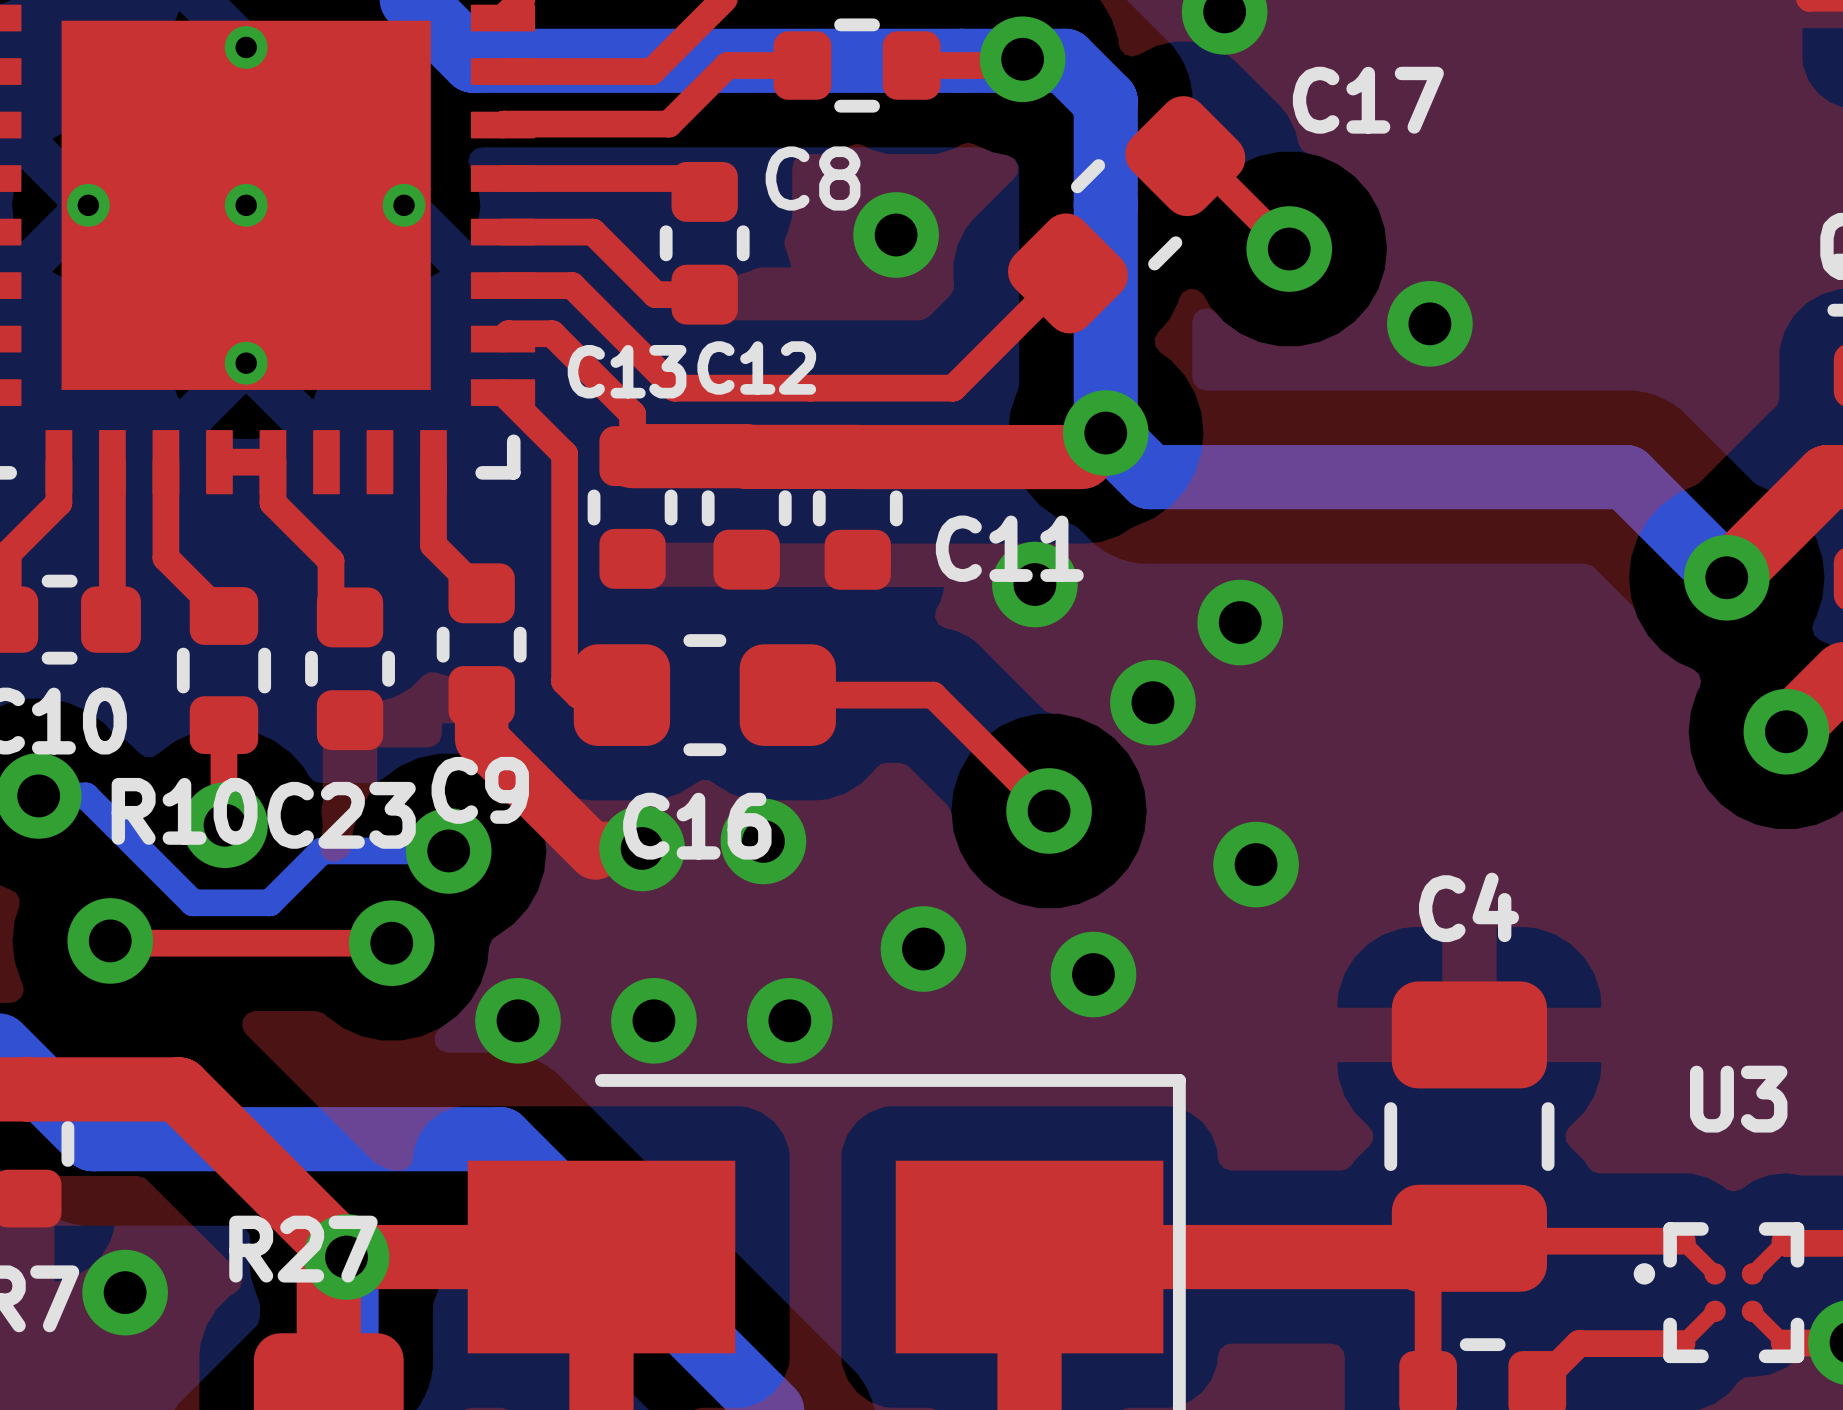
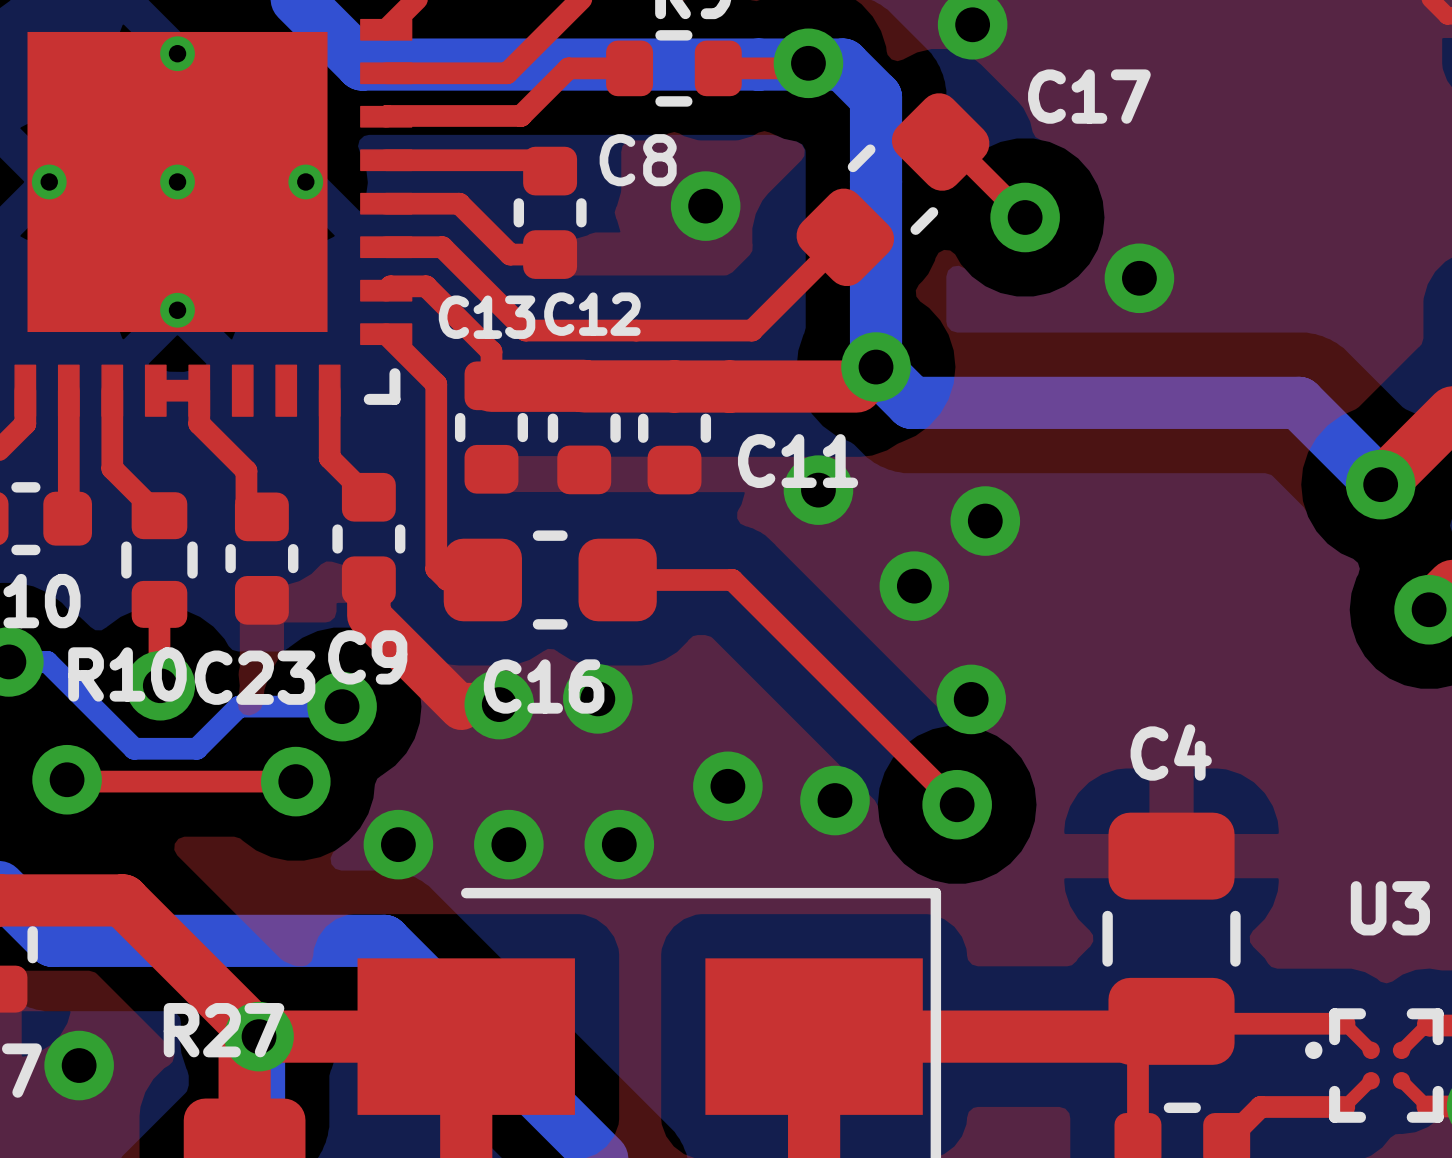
top track: (929, 695) (933, 695) (1049, 810) -> (732, 580) (957, 804)
via: (1049, 810) -> none
via position: (1256, 864) -> (971, 699)
via: none -> (957, 804)
via position: (1093, 974) -> (834, 800)

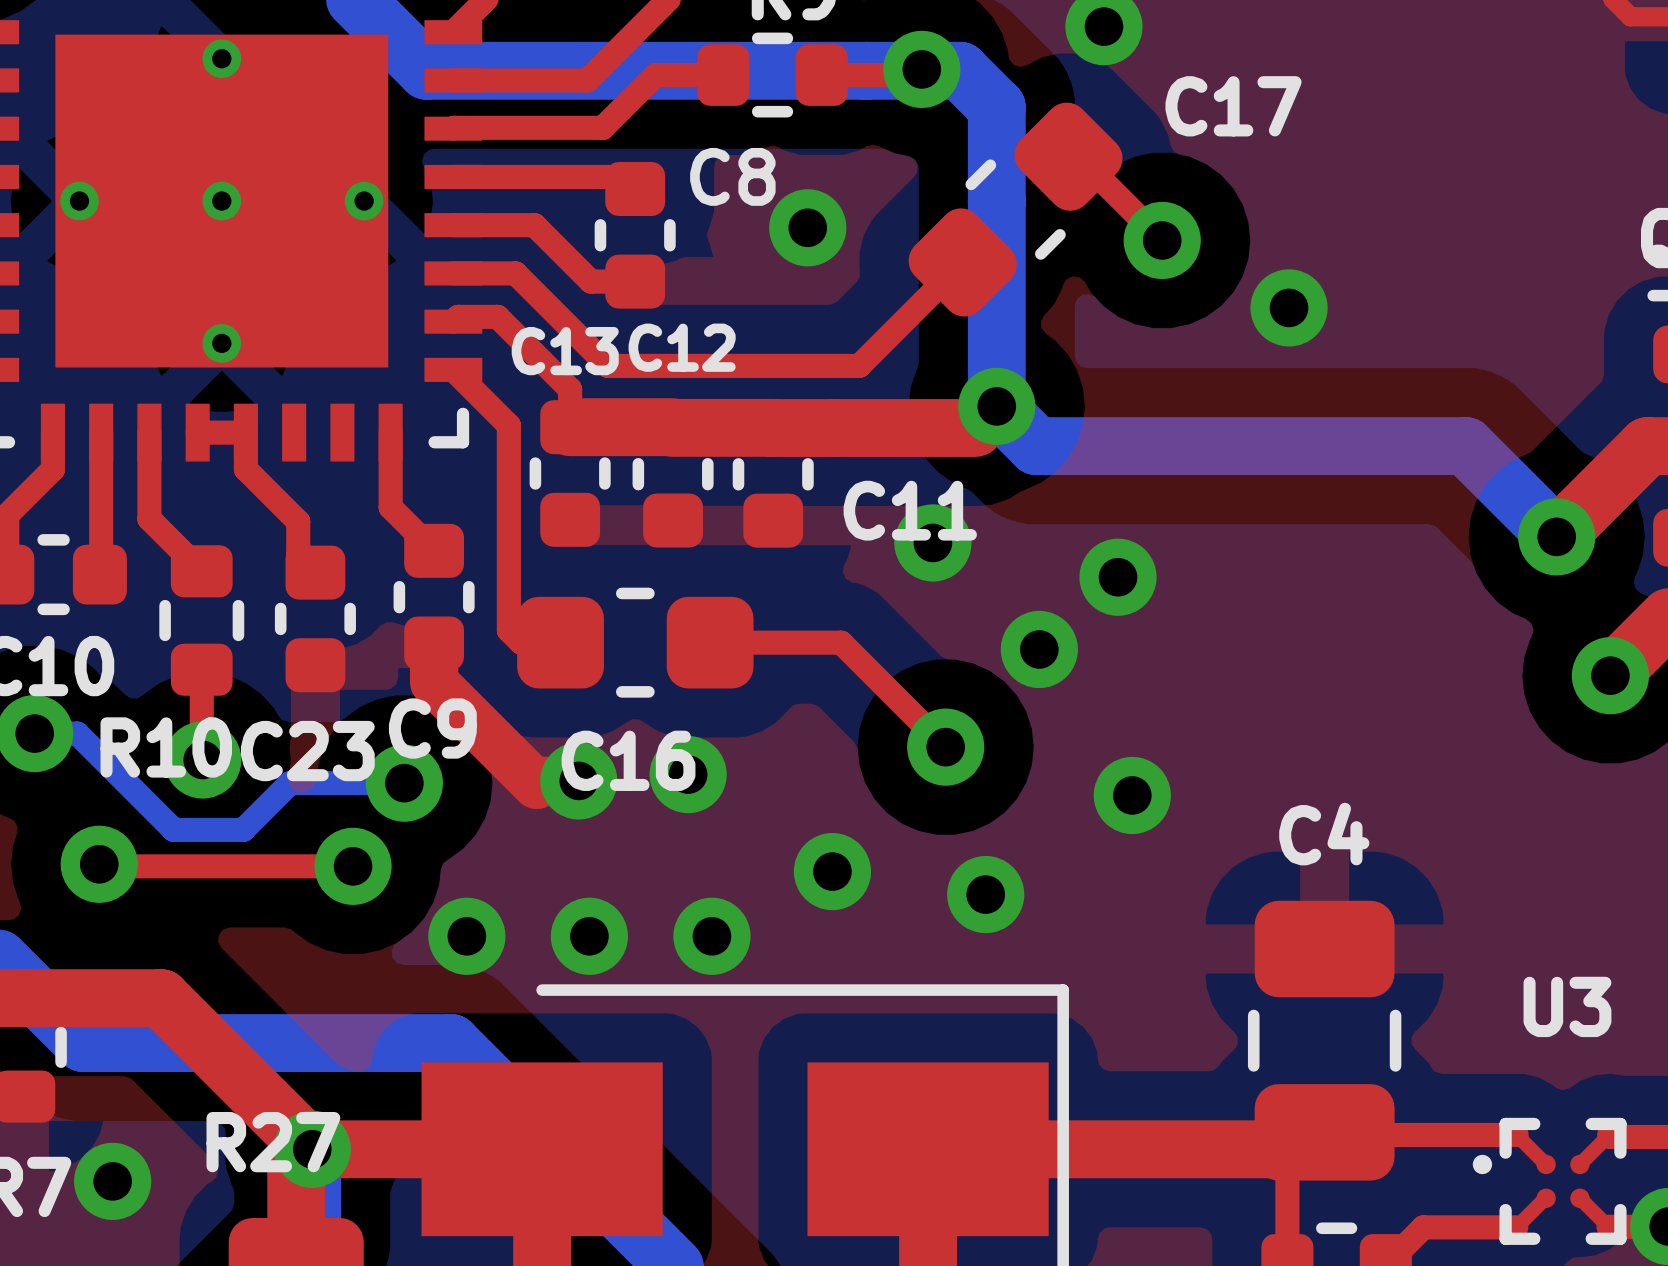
top track: (732, 580) (957, 804) -> (837, 642) (841, 642) (945, 747)
via: none -> (945, 747)
via position: (971, 699) -> (1132, 795)
via position: (834, 800) -> (985, 894)
via: (957, 804) -> none

